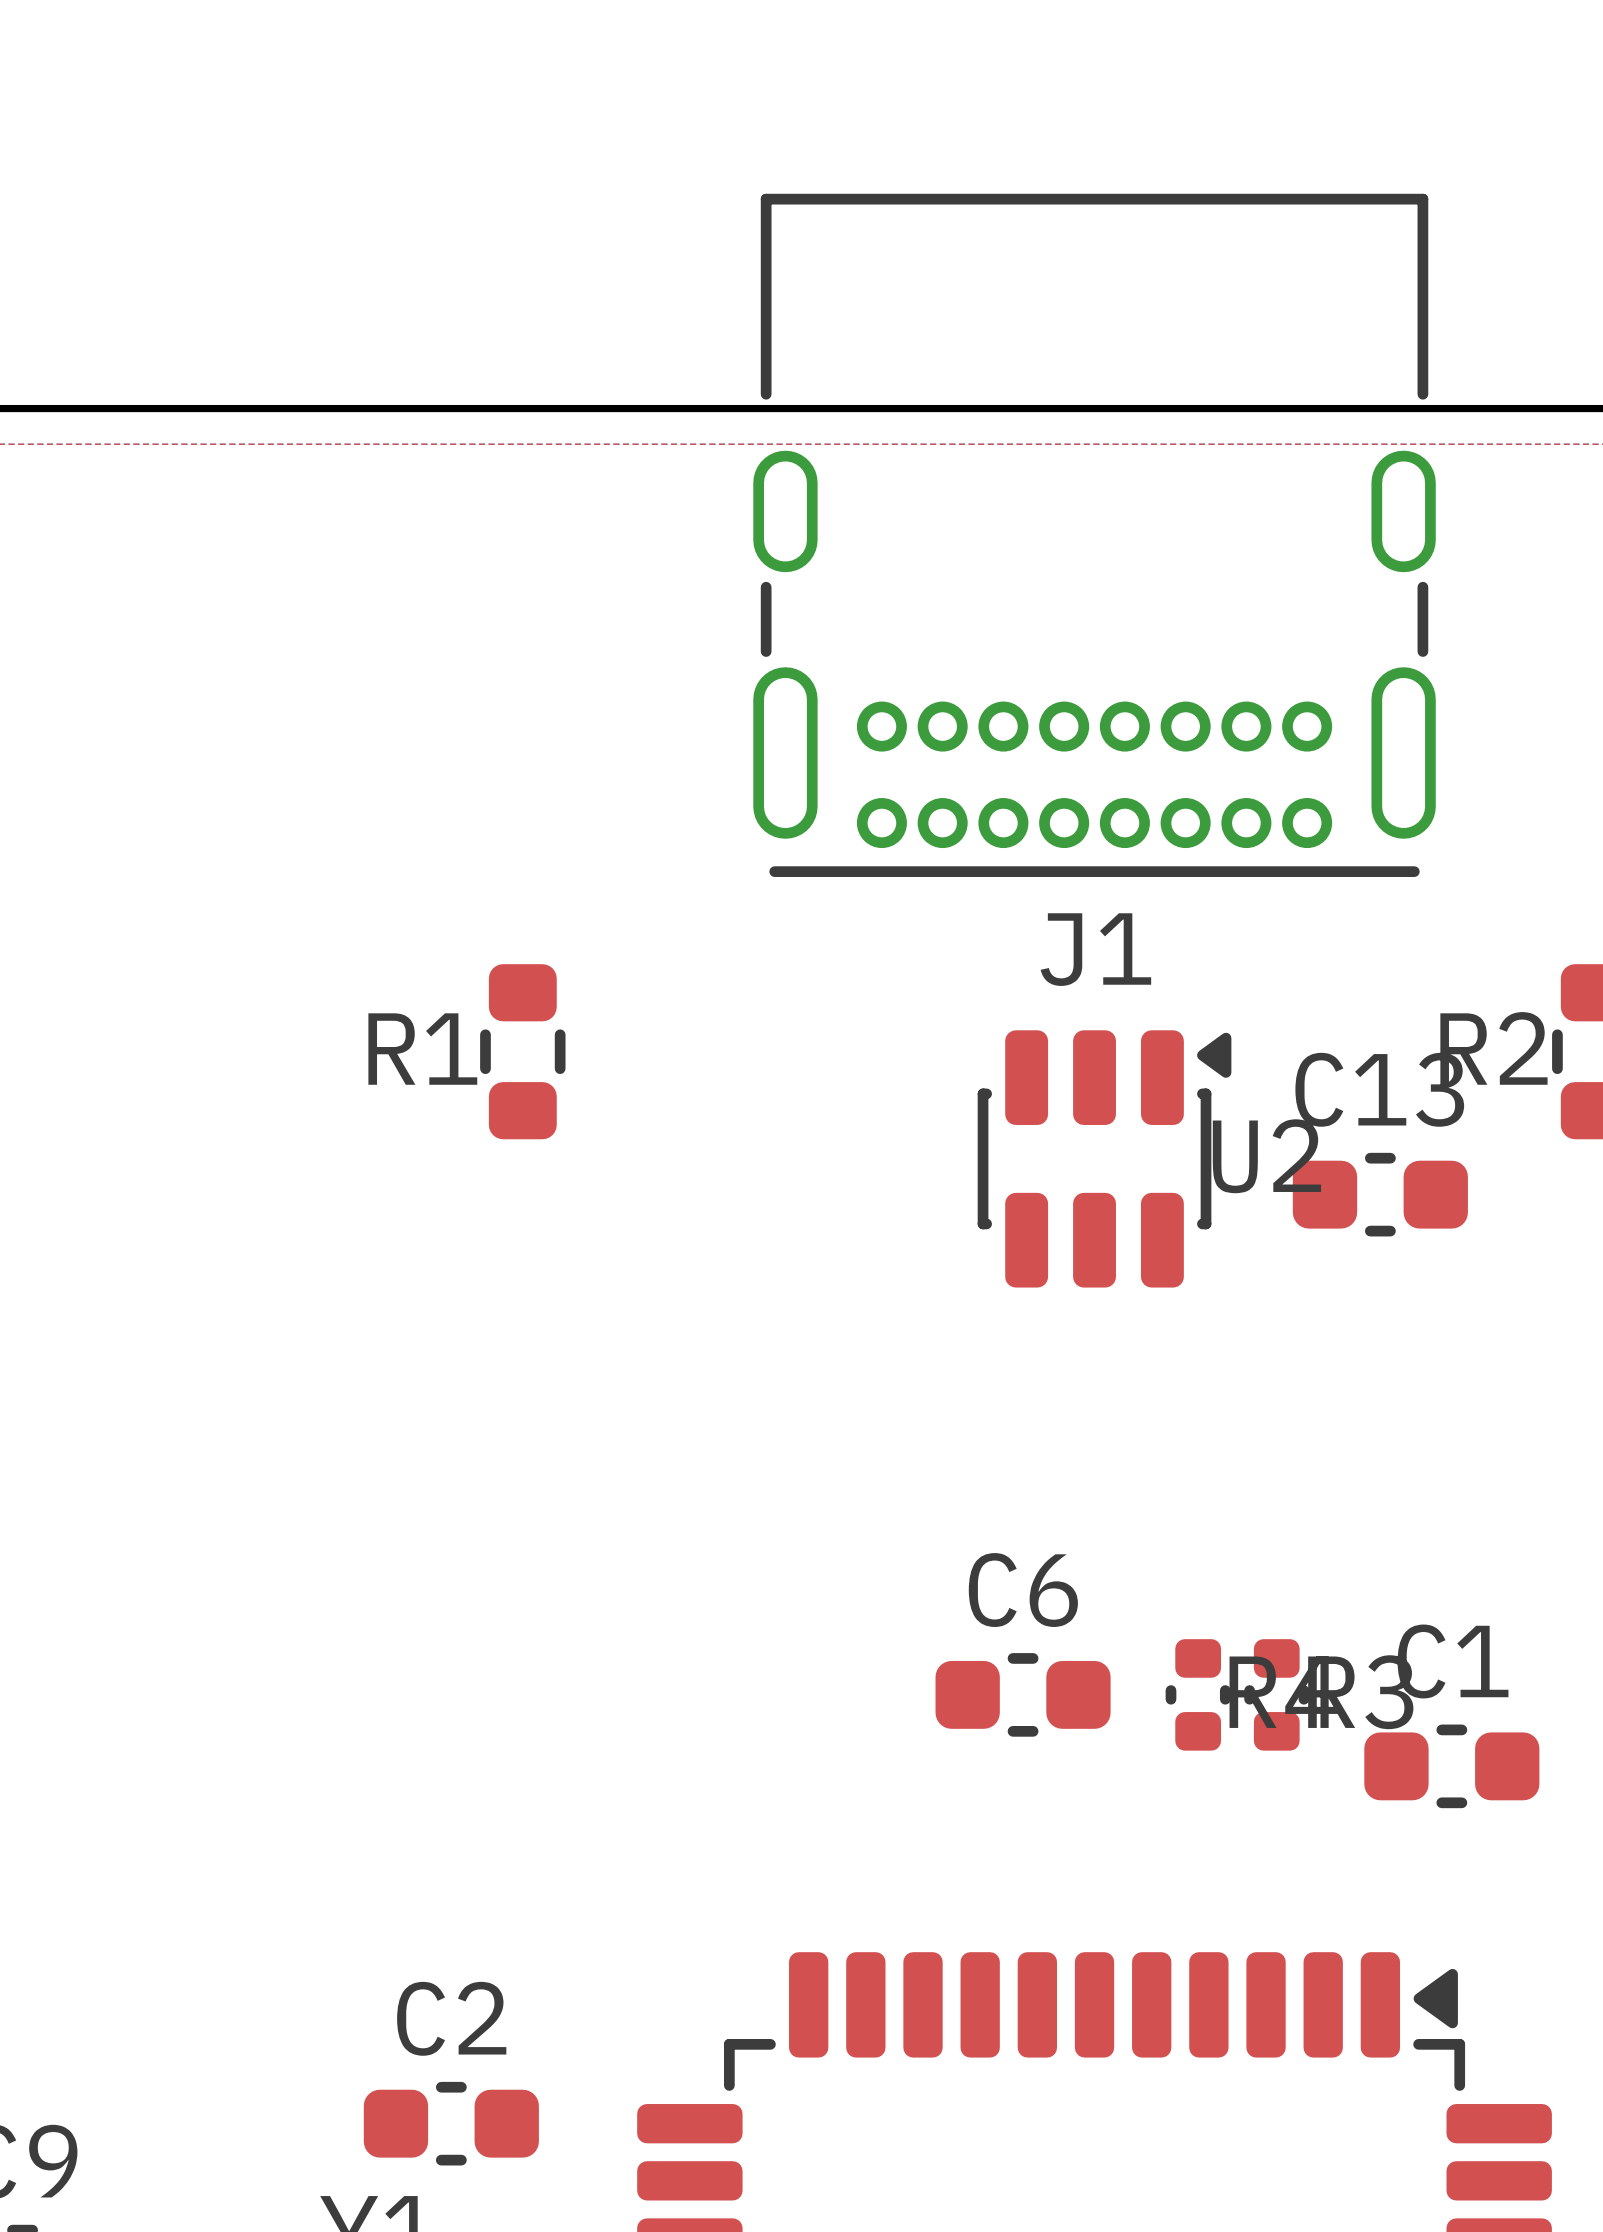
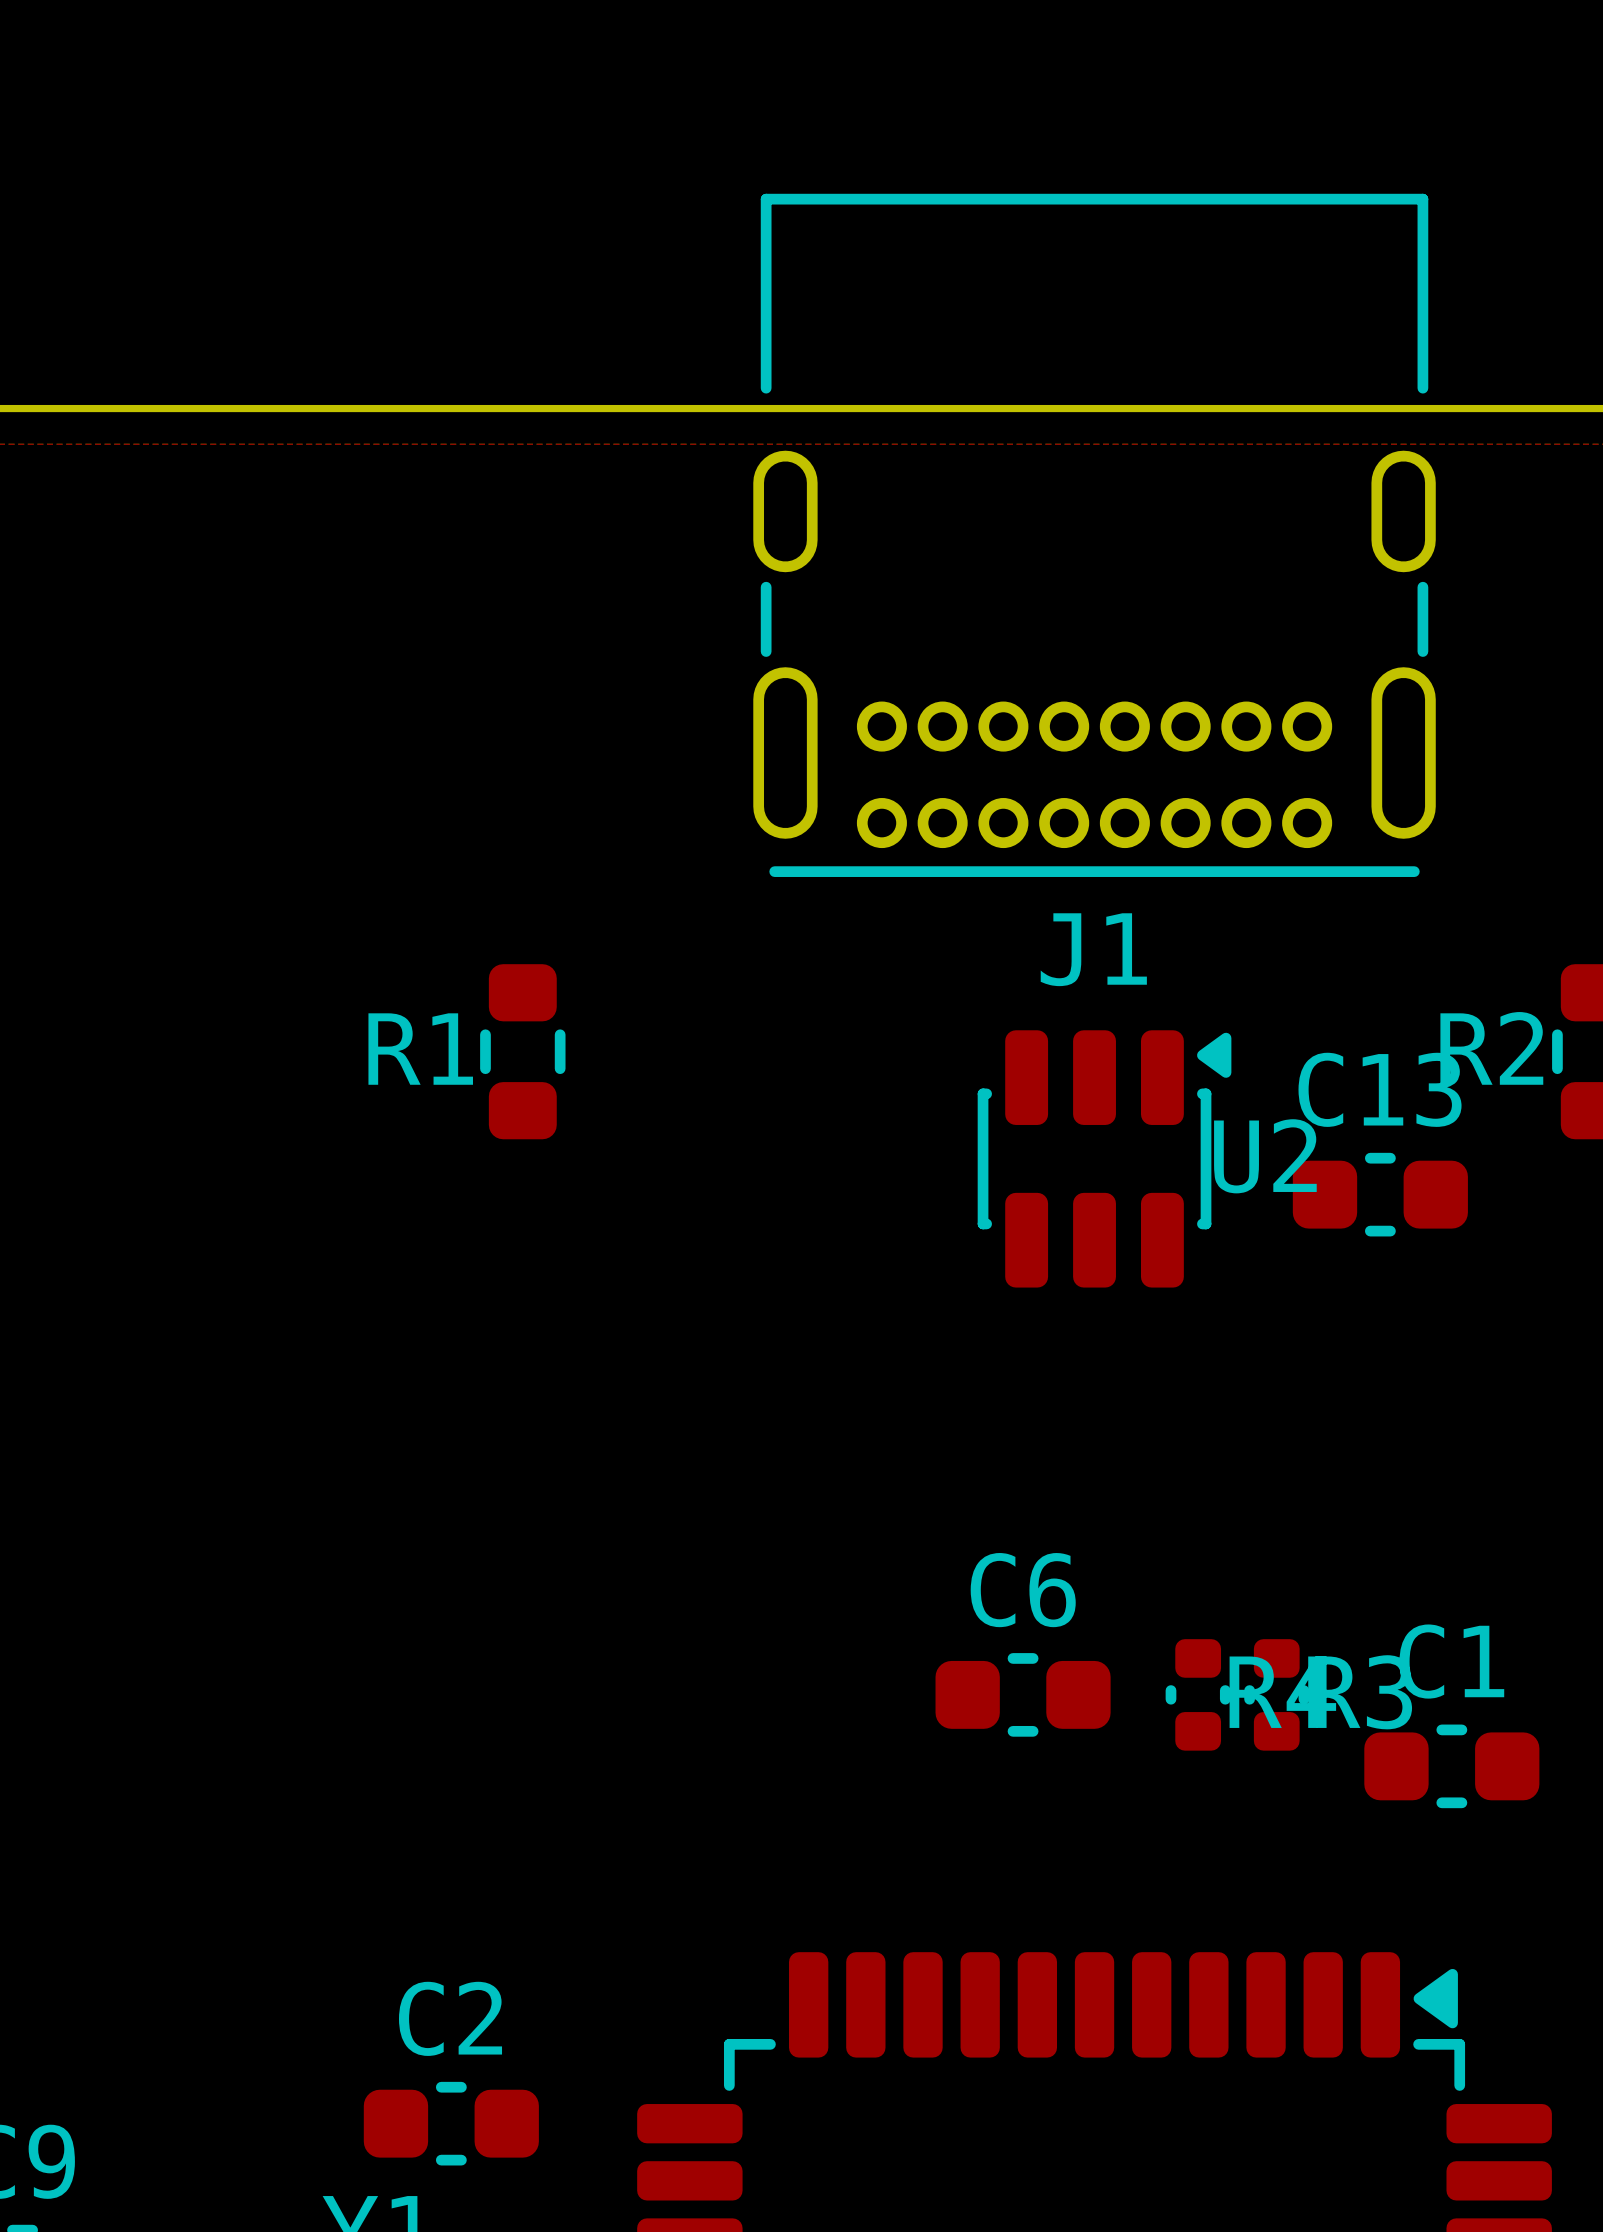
J1 footprint: [753, 193, 1436, 877] -> [753, 193, 1436, 877]

